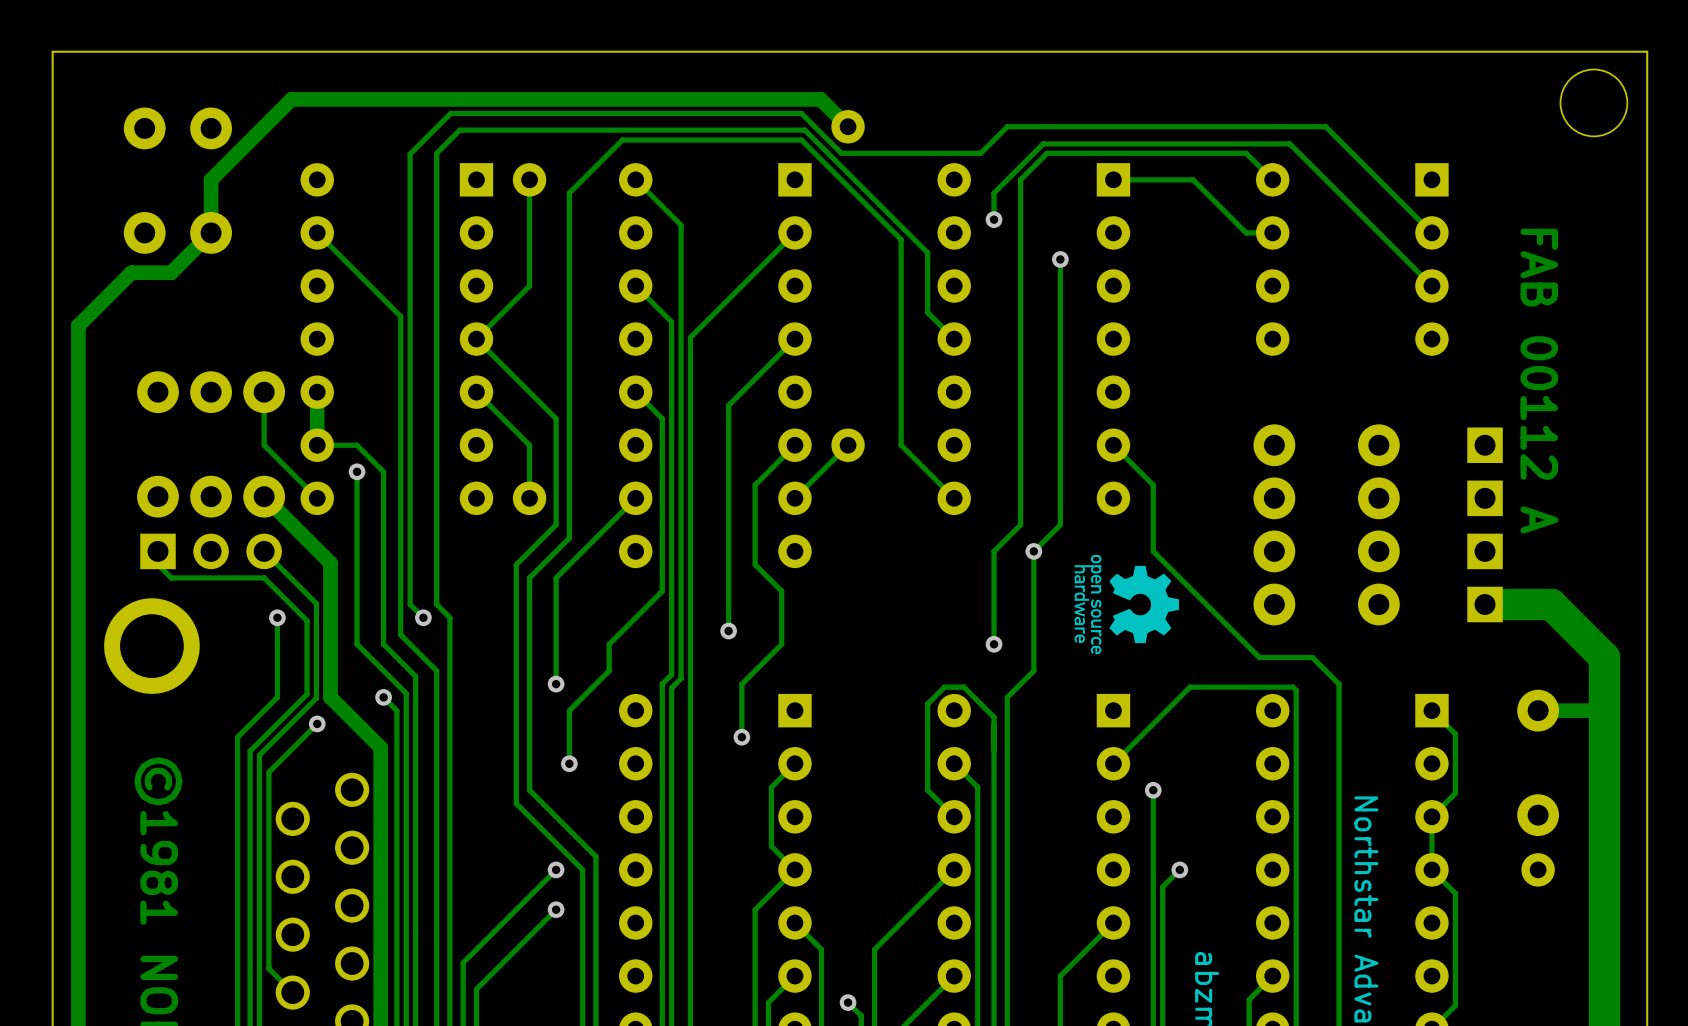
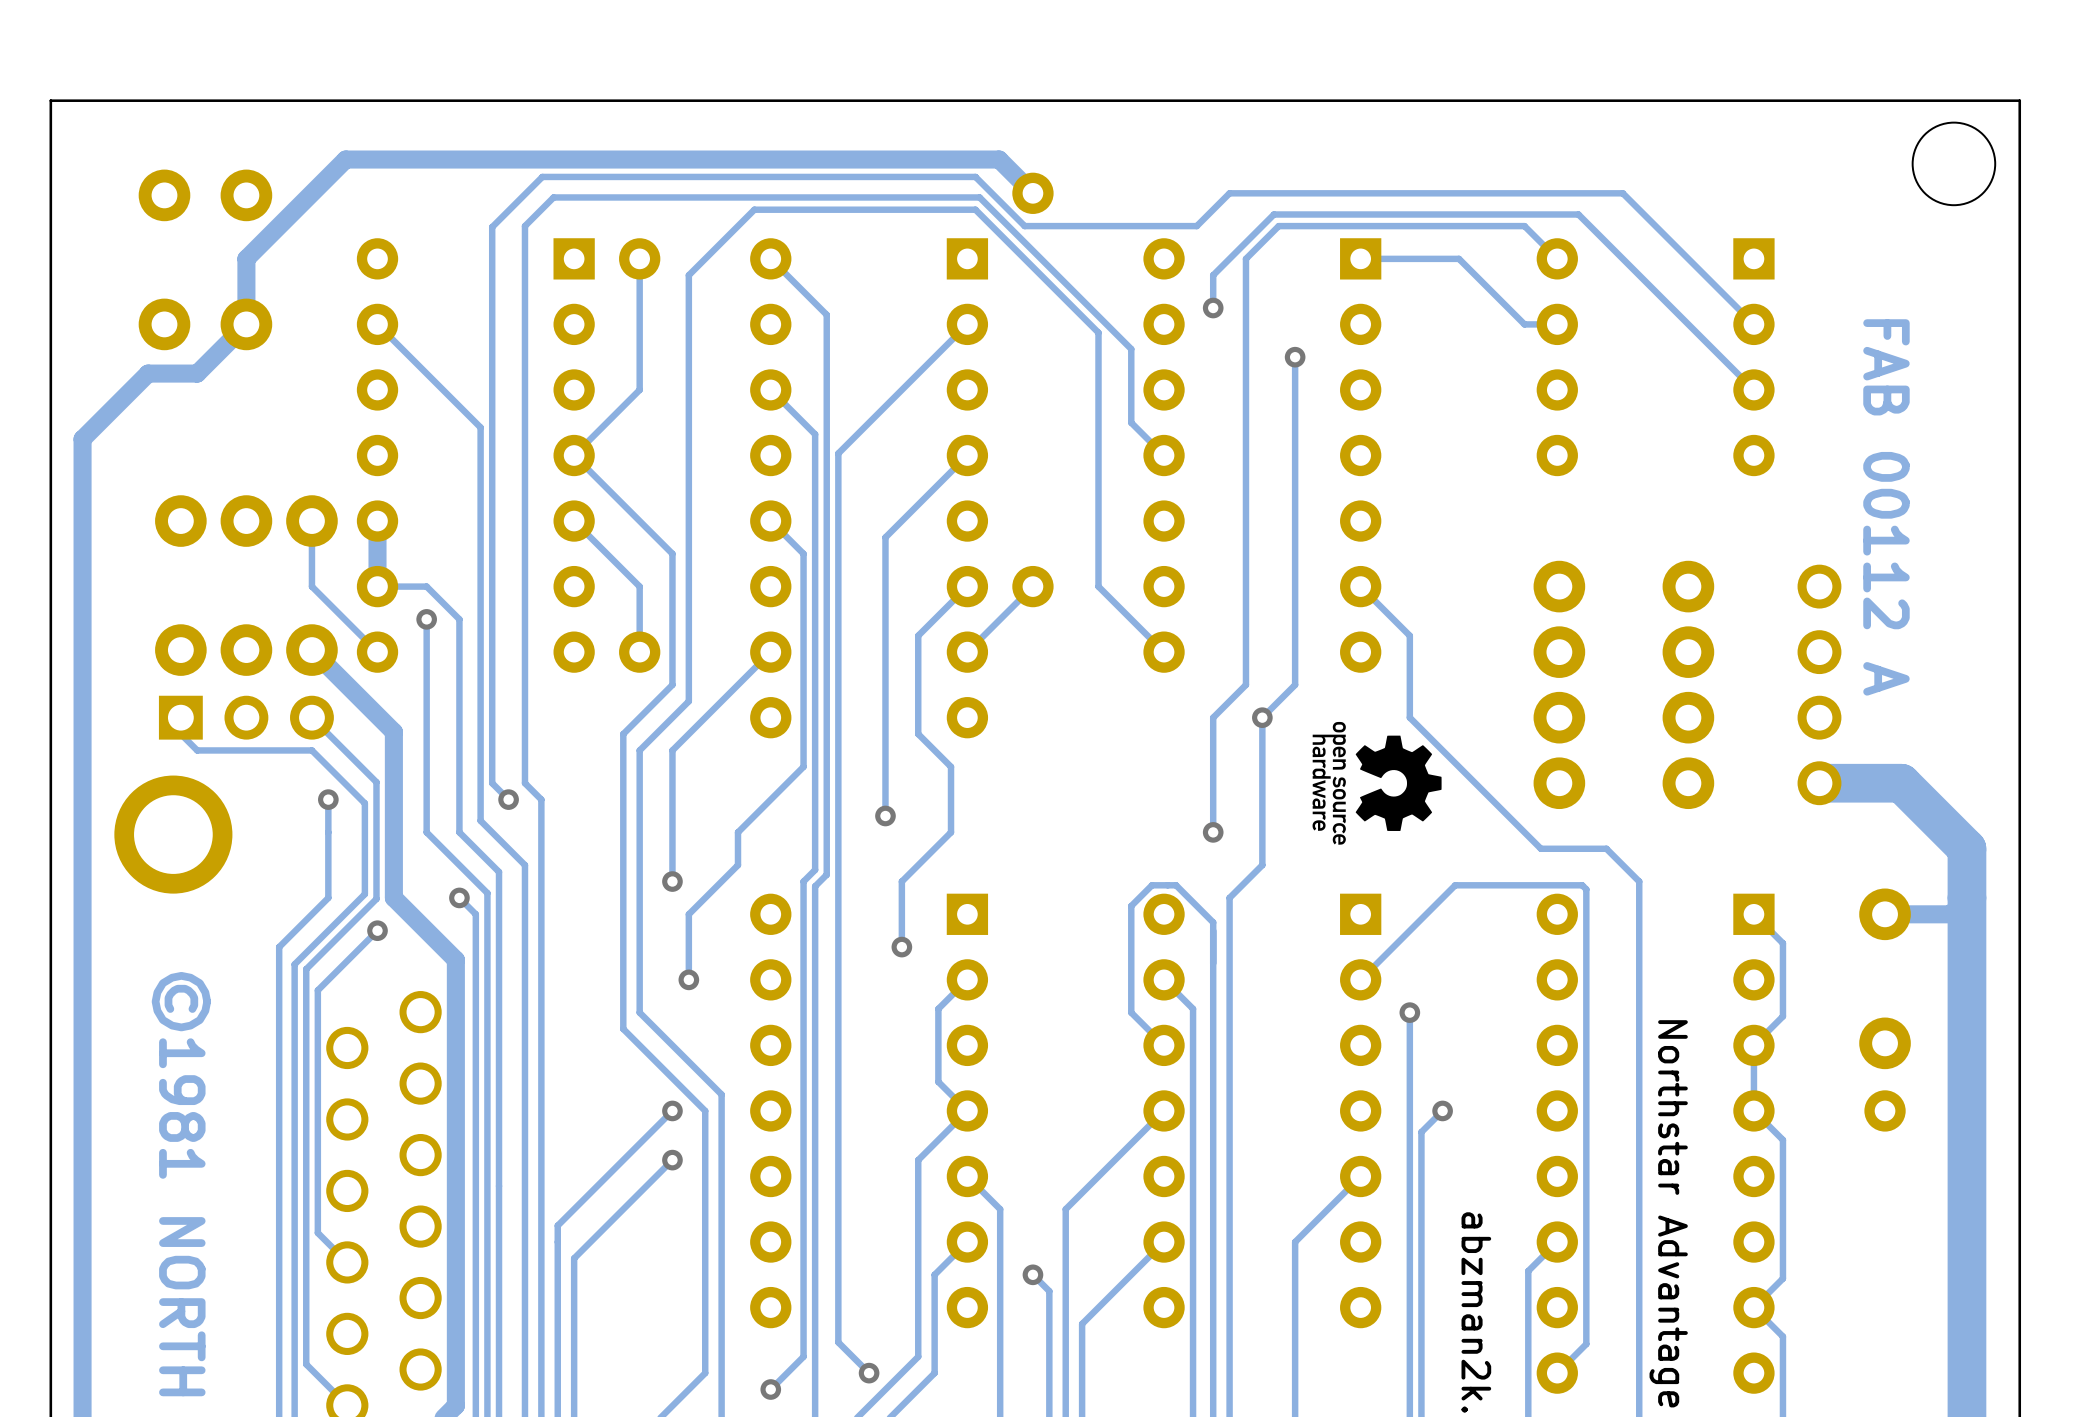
part footprint: [1467, 427, 1503, 464] -> [1797, 564, 1842, 609]
part footprint: [1467, 480, 1503, 517] -> [1797, 630, 1842, 675]
part footprint: [1467, 533, 1503, 570] -> [1797, 695, 1842, 740]
part footprint: [1467, 586, 1503, 623] -> [1797, 761, 1842, 806]

